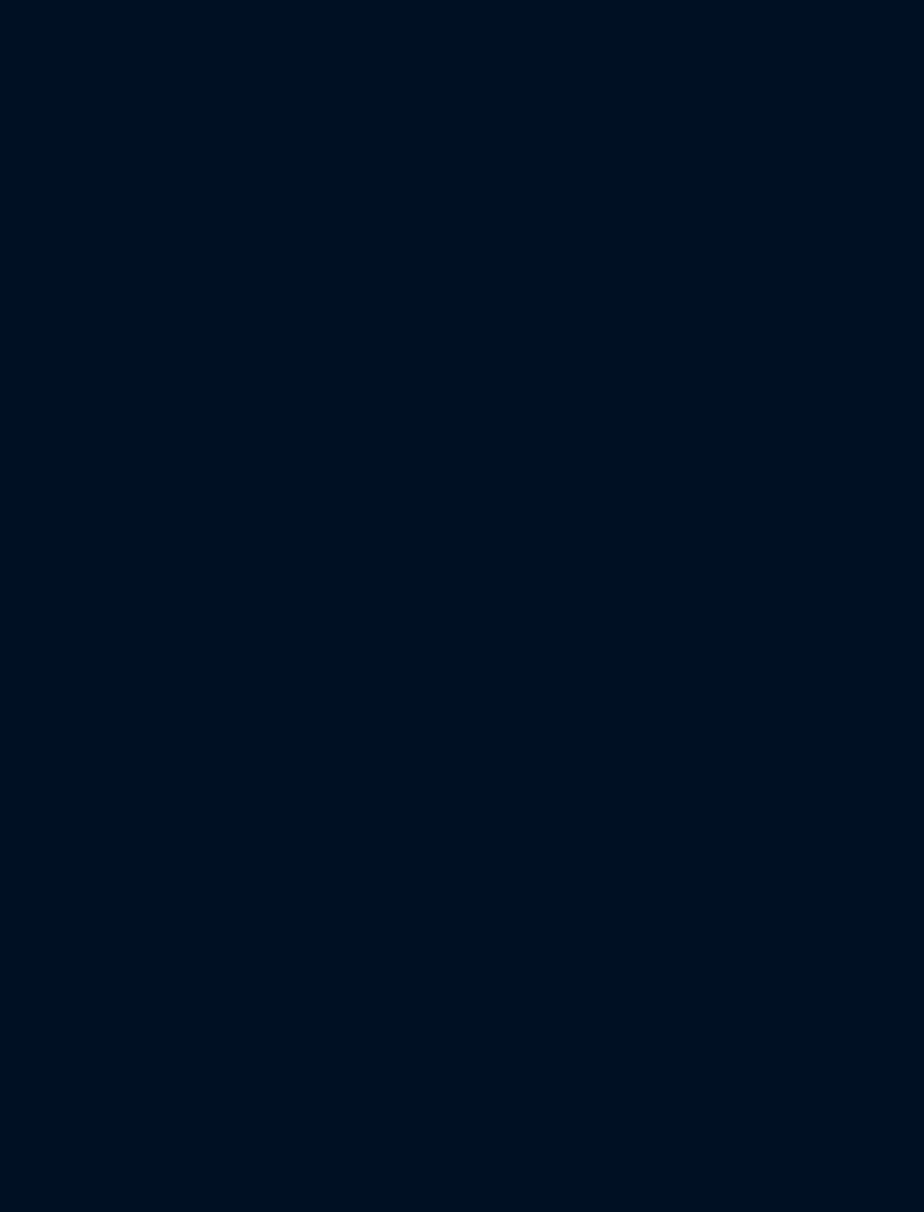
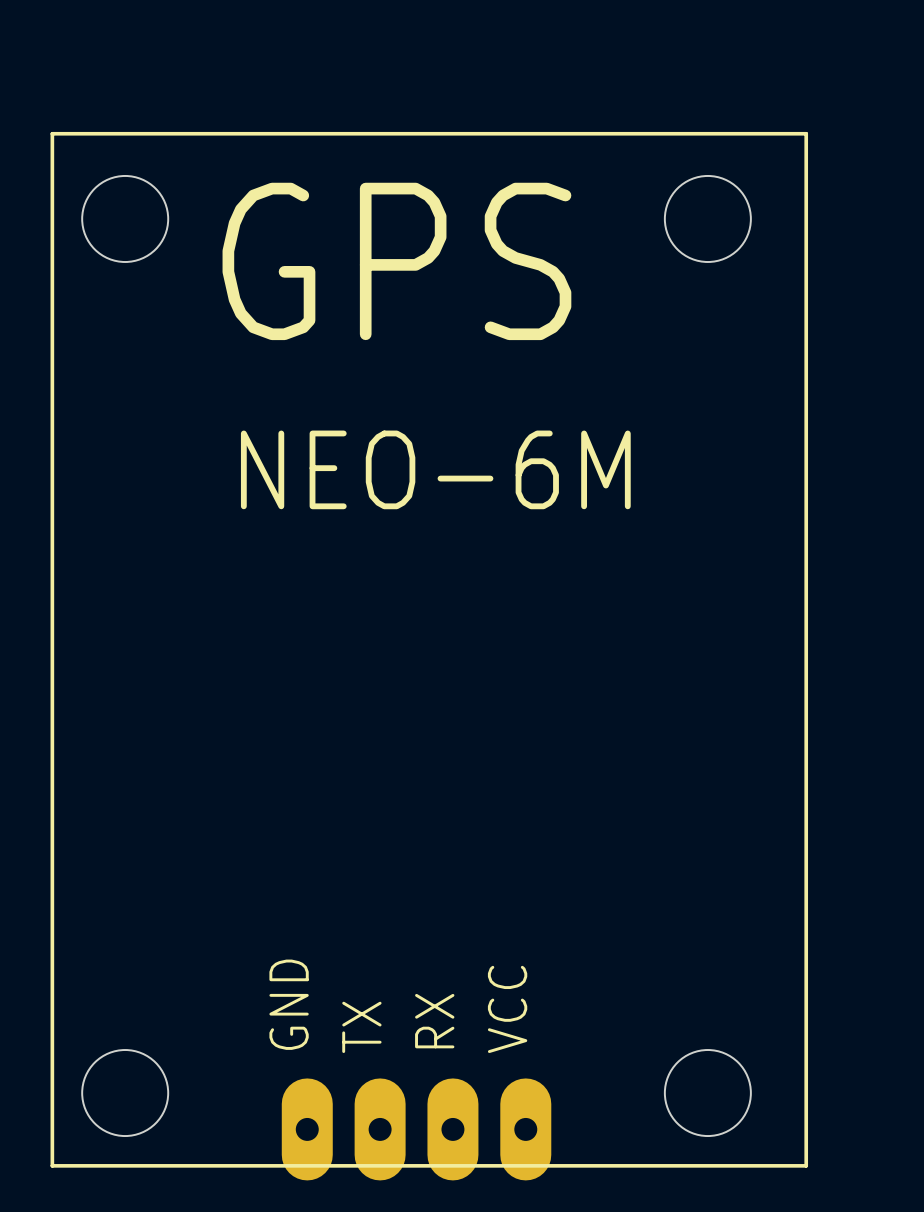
part: none -> (429, 656)

